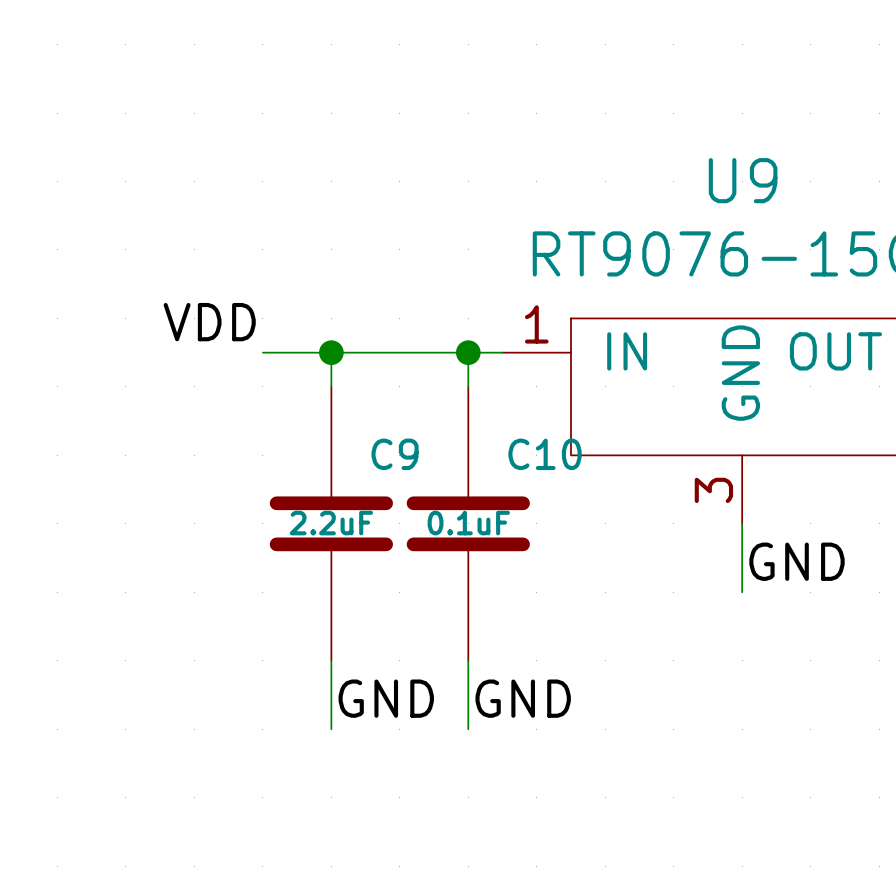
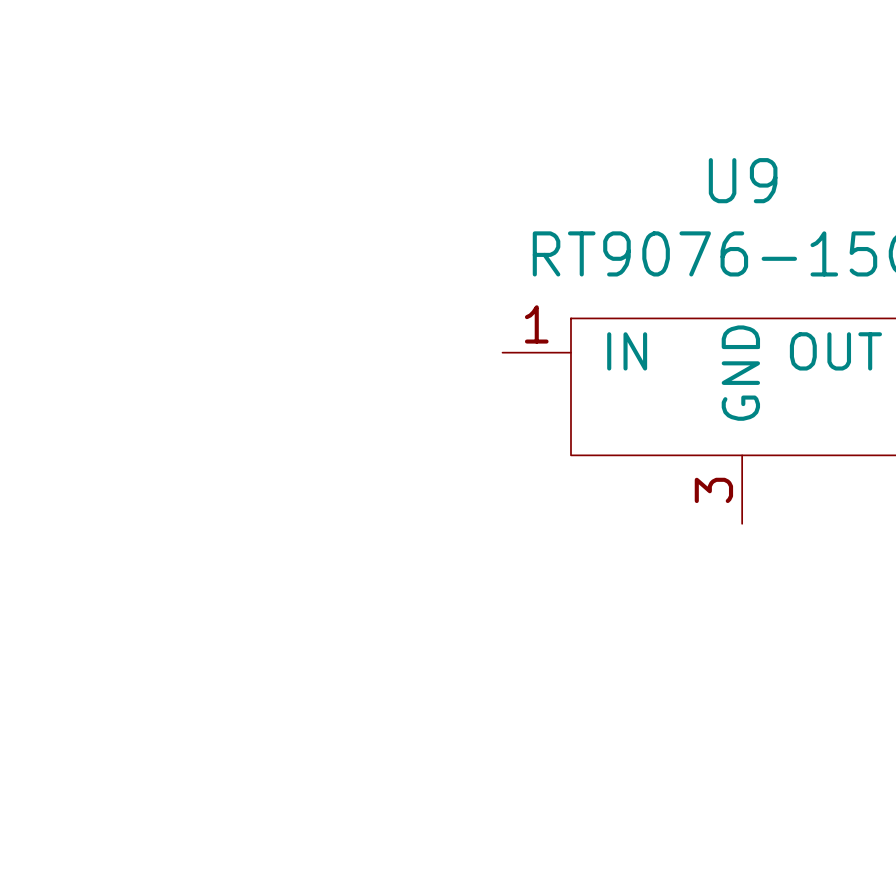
label: VDD (209, 322) -> none
wire: (262, 352) (502, 352) -> none
wire: (331, 352) (331, 386) -> none
junction: (331, 352) -> none
wire: (468, 352) (468, 386) -> none
junction: (468, 352) -> none
C9: 2.2uF (331, 523) -> none
C10: 0.1uF (468, 523) -> none
wire: (742, 523) (742, 592) -> none
label: GND (797, 561) -> none
wire: (331, 660) (331, 729) -> none
wire: (468, 660) (468, 729) -> none
label: GND (386, 698) -> none
label: GND (523, 698) -> none

